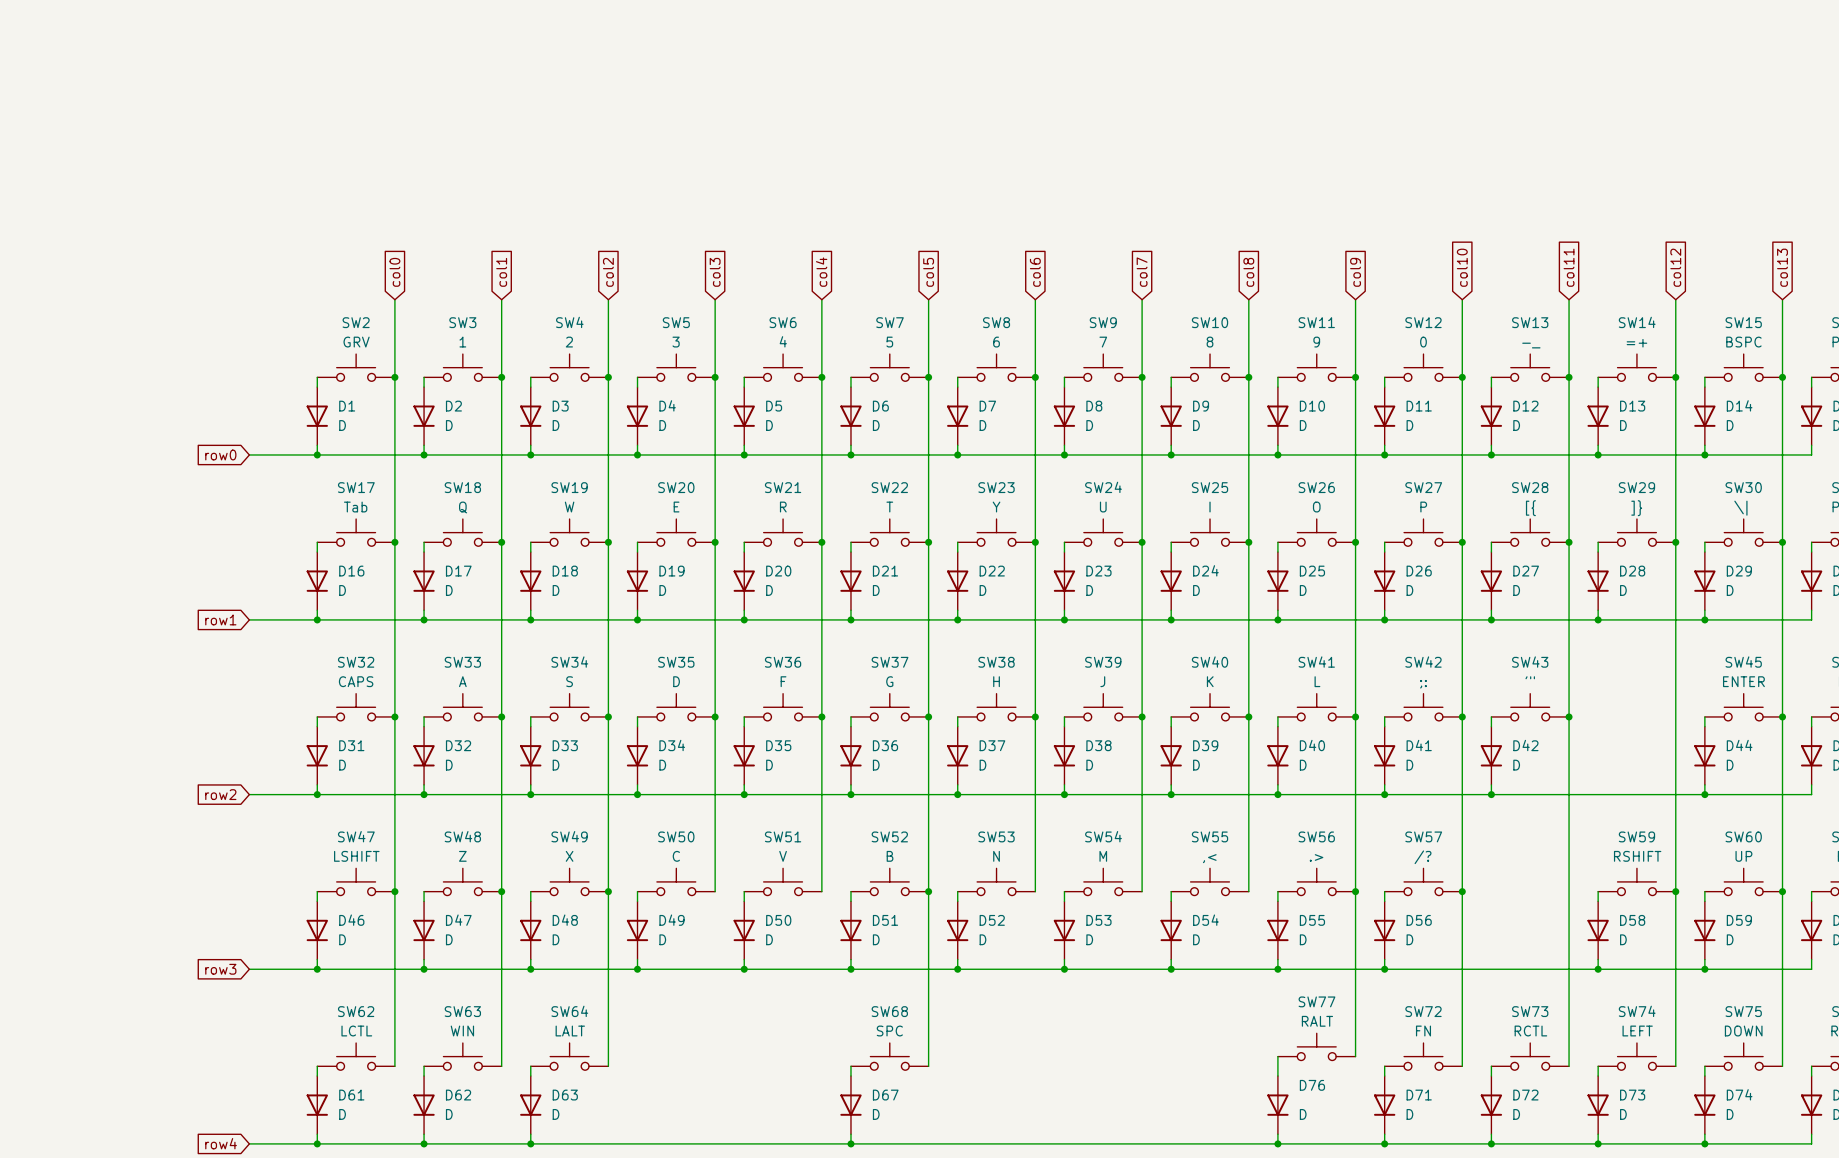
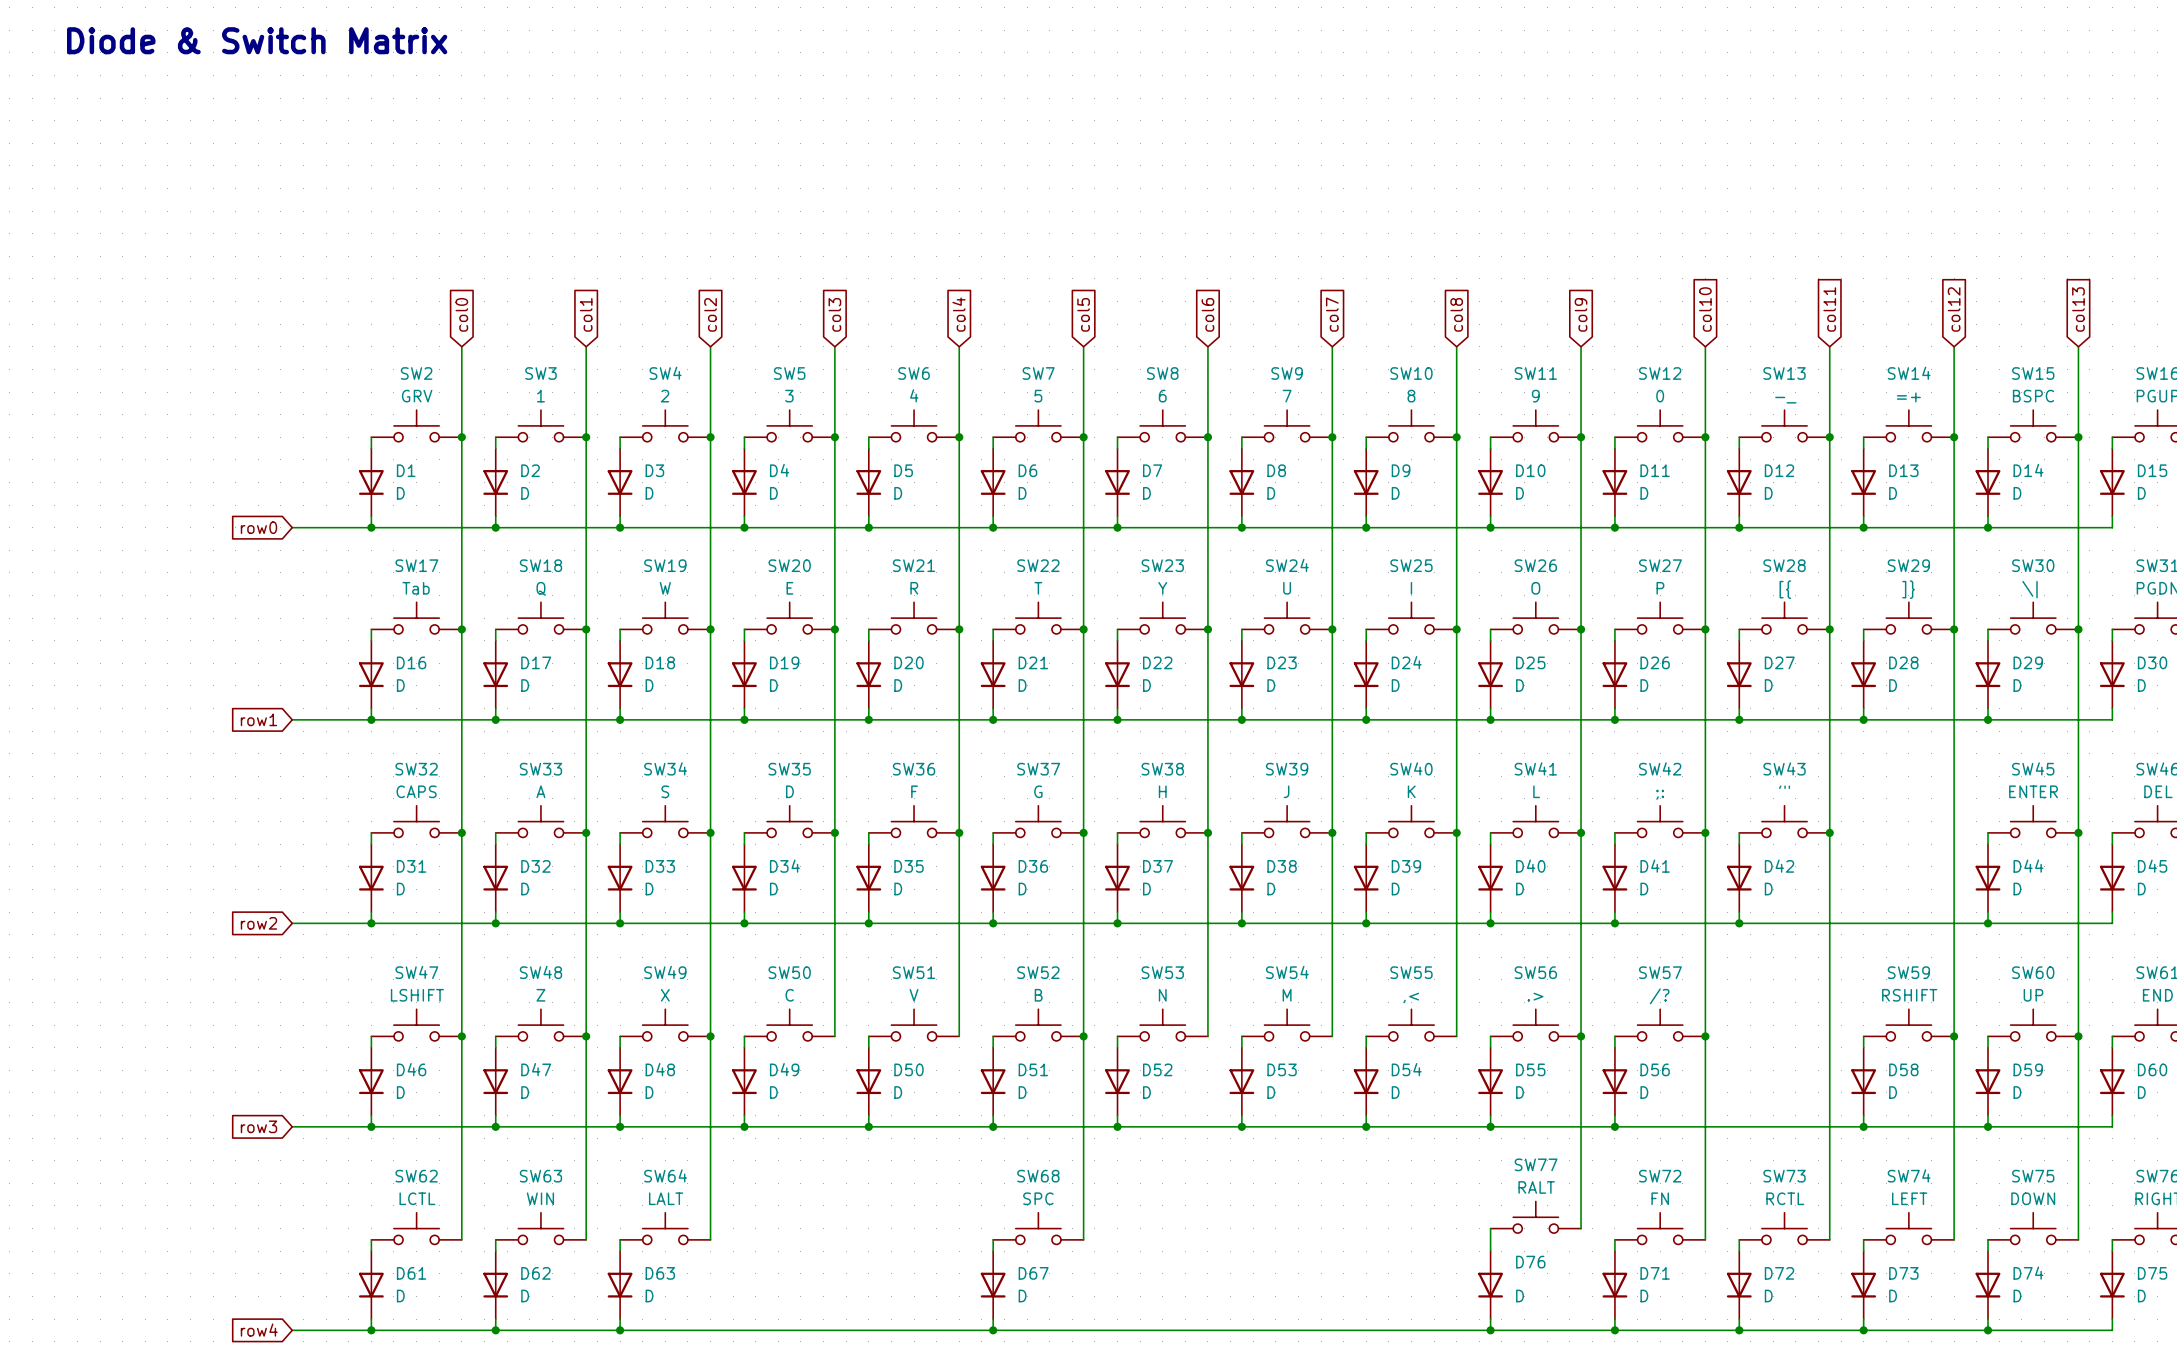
text: none -> Diode & Switch Matrix (257, 40)

